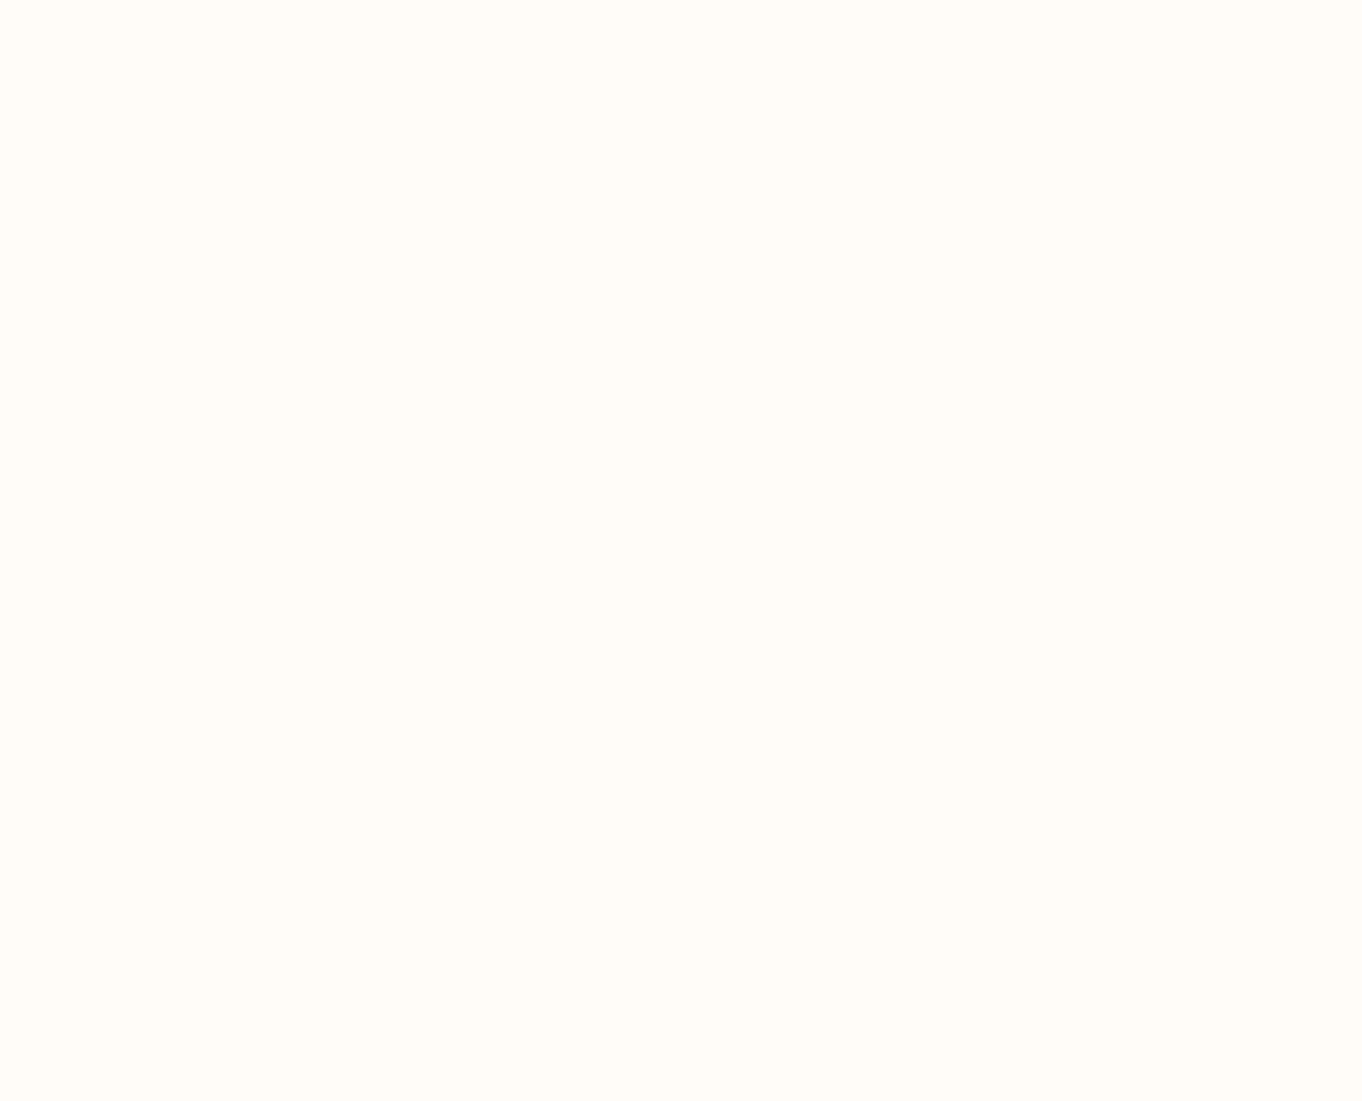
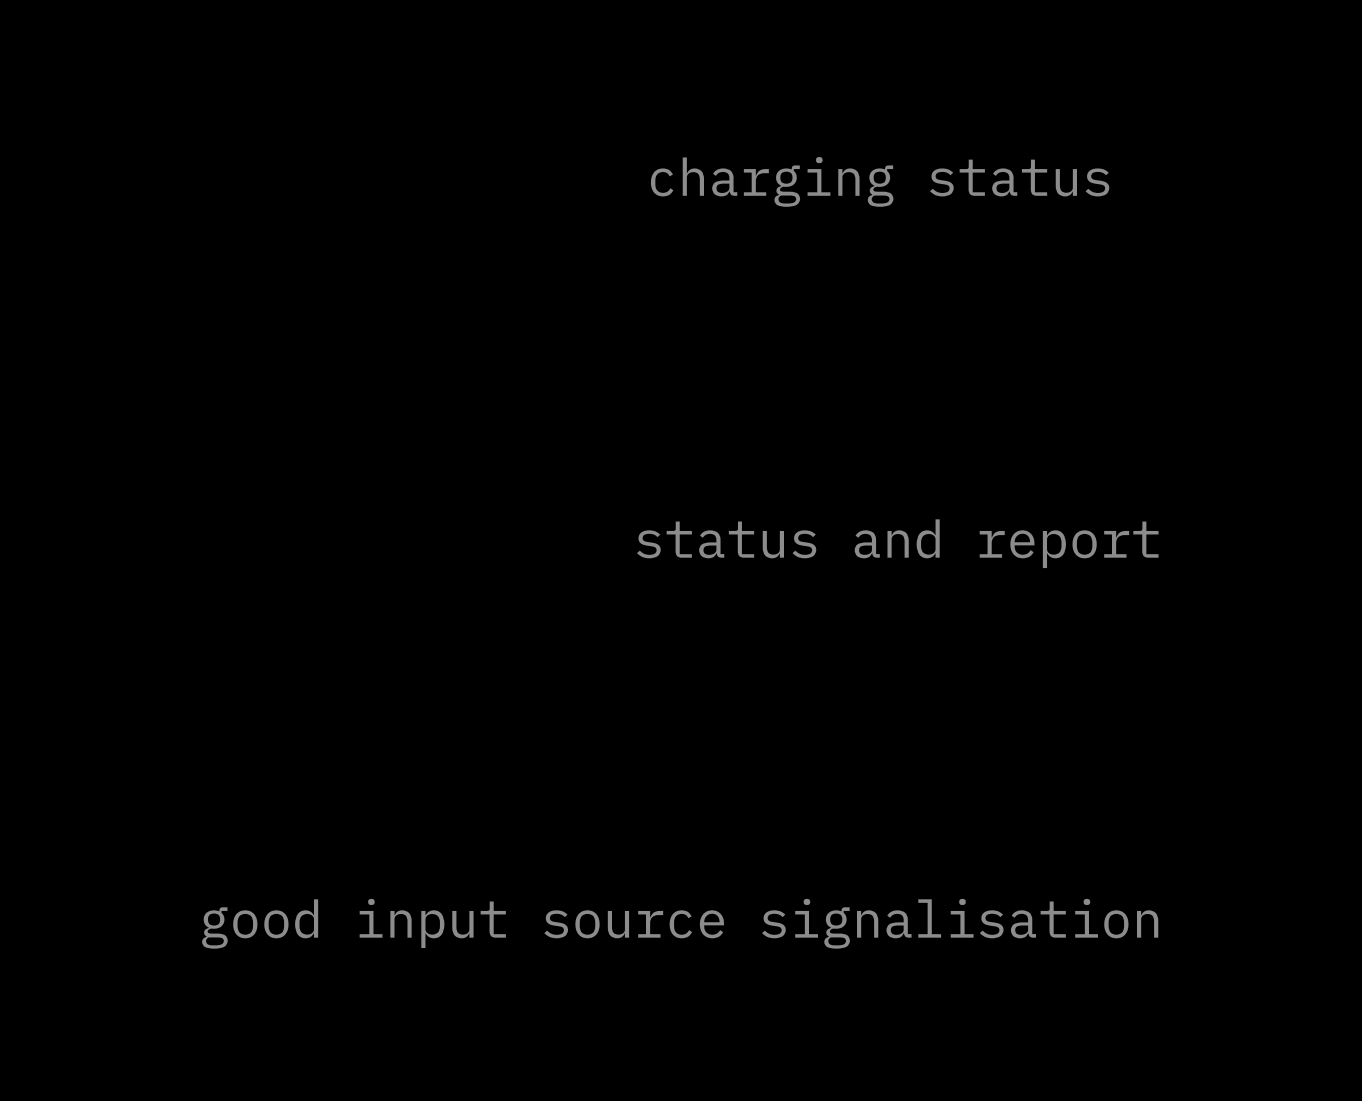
text: none -> charging status (880, 181)
text: none -> status and report (897, 543)
text: none -> good input source signalisation (680, 923)

